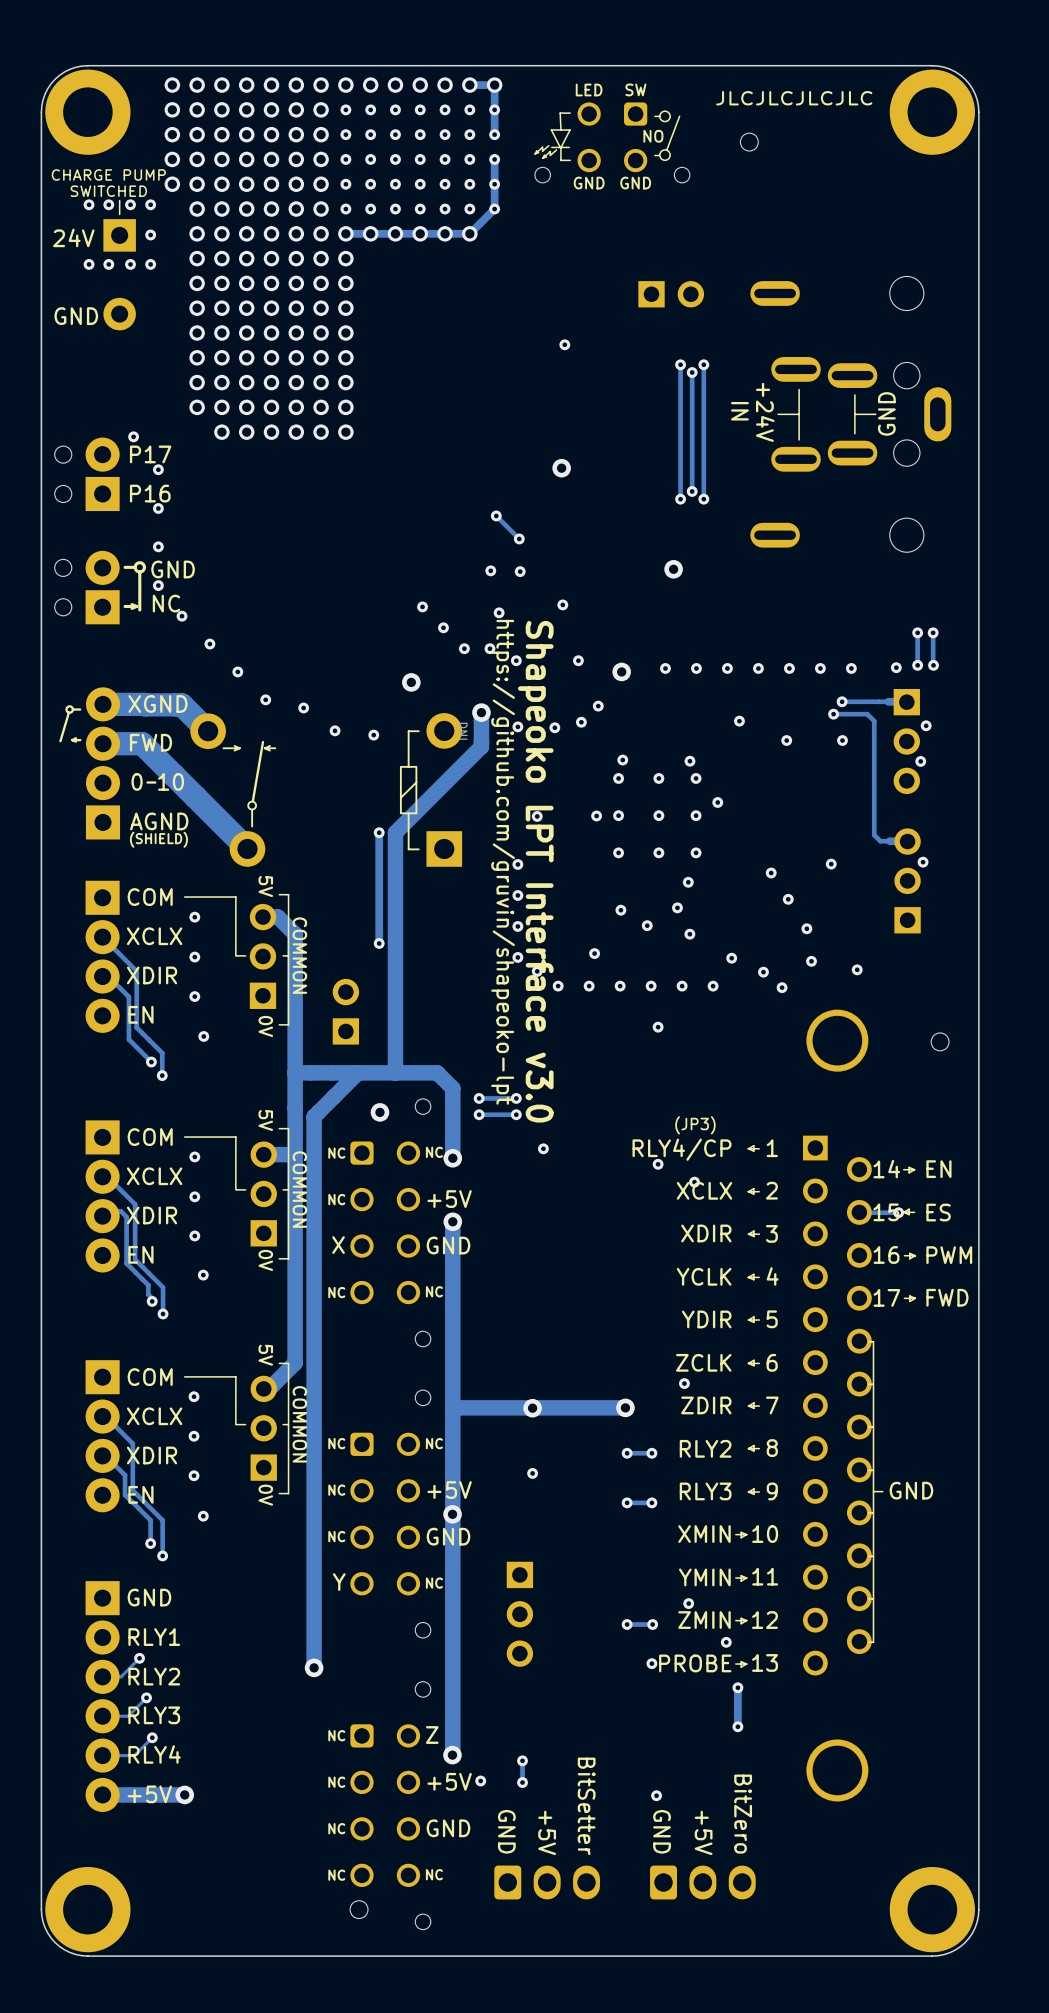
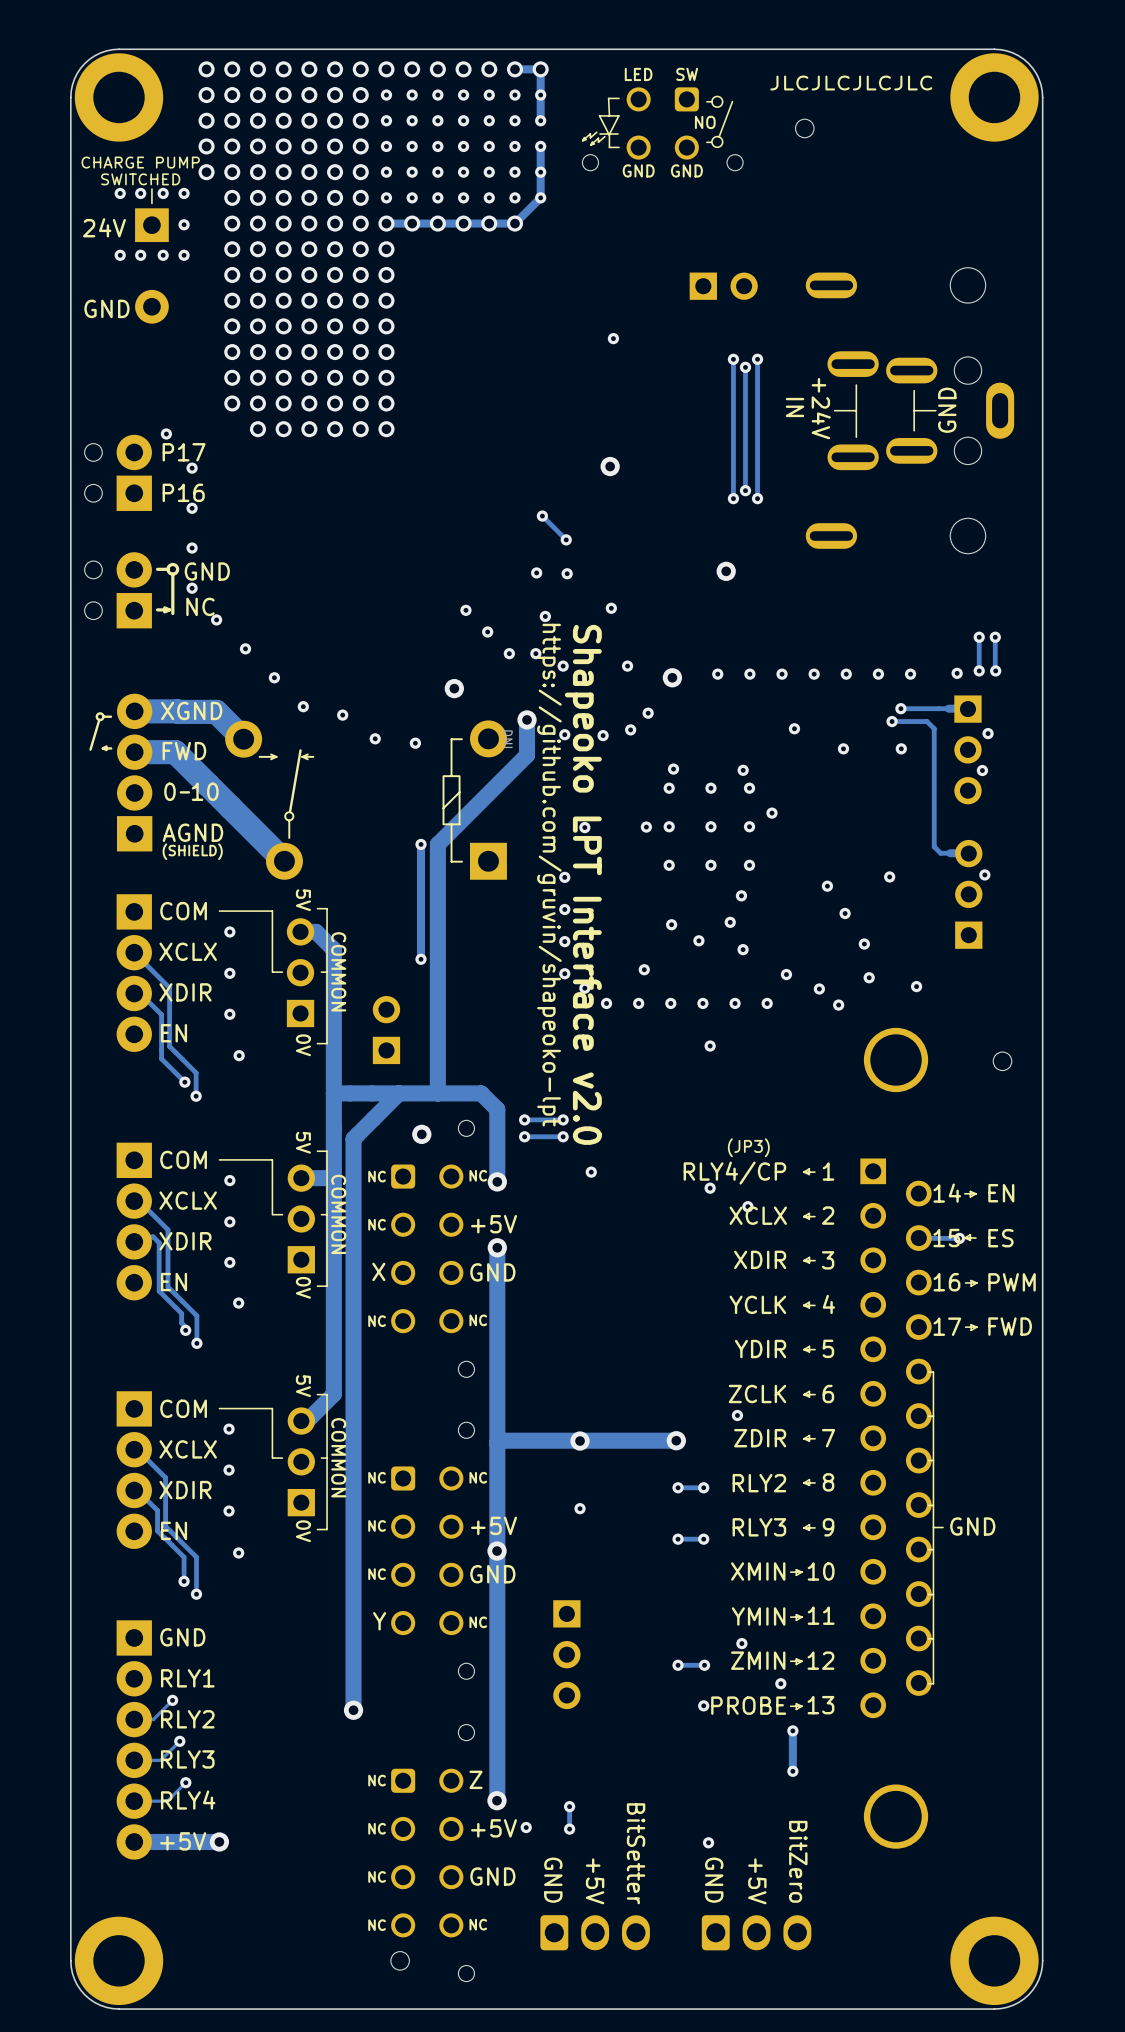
text: Shapeoko LPT Interface v3.0 (535, 871) -> Shapeoko LPT Interface v2.0 (583, 884)

